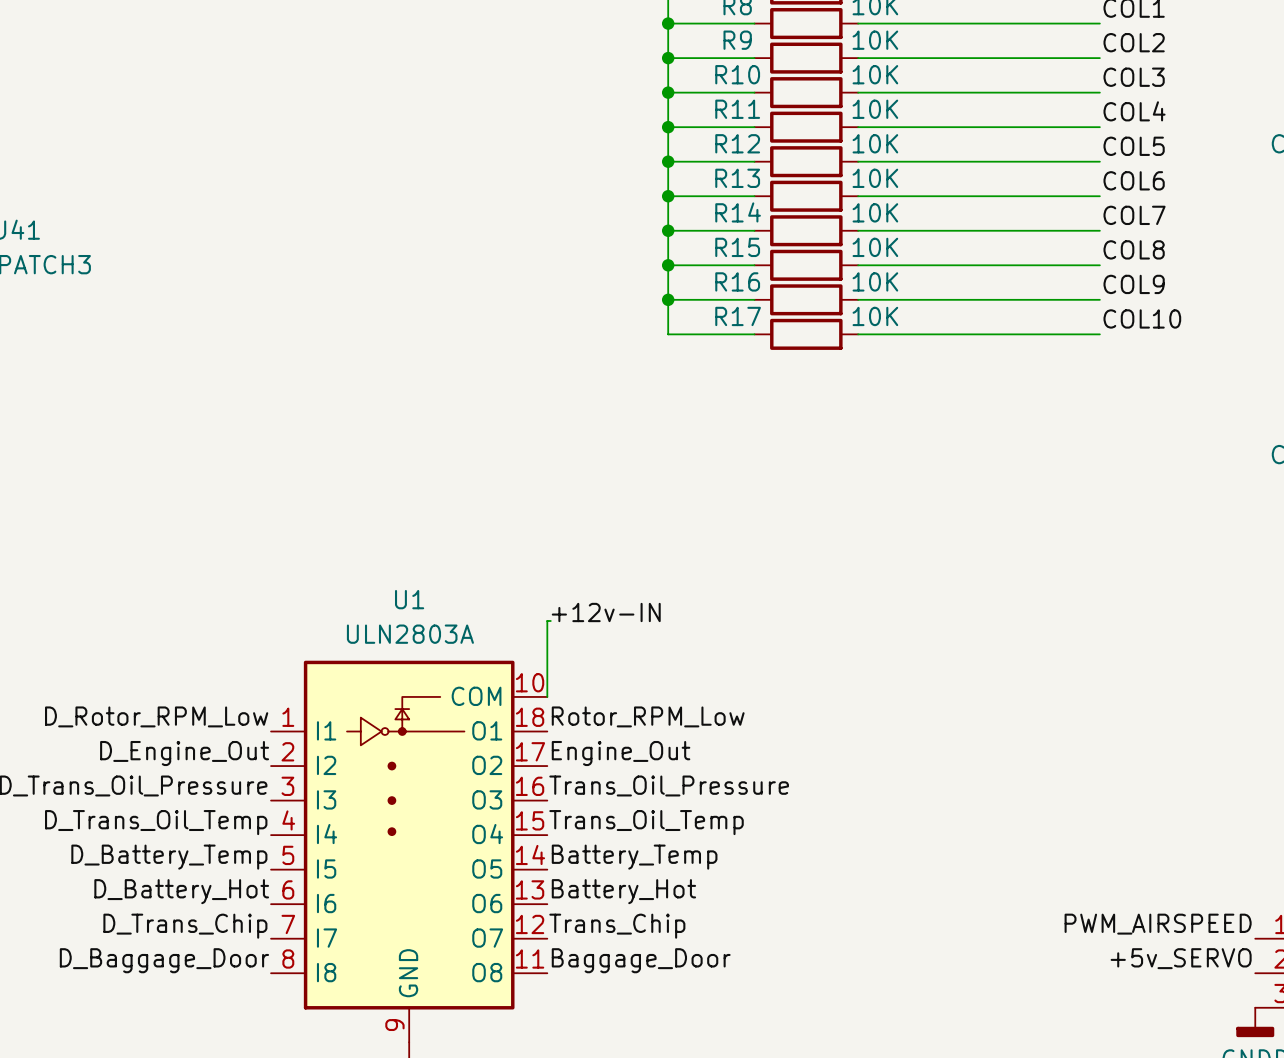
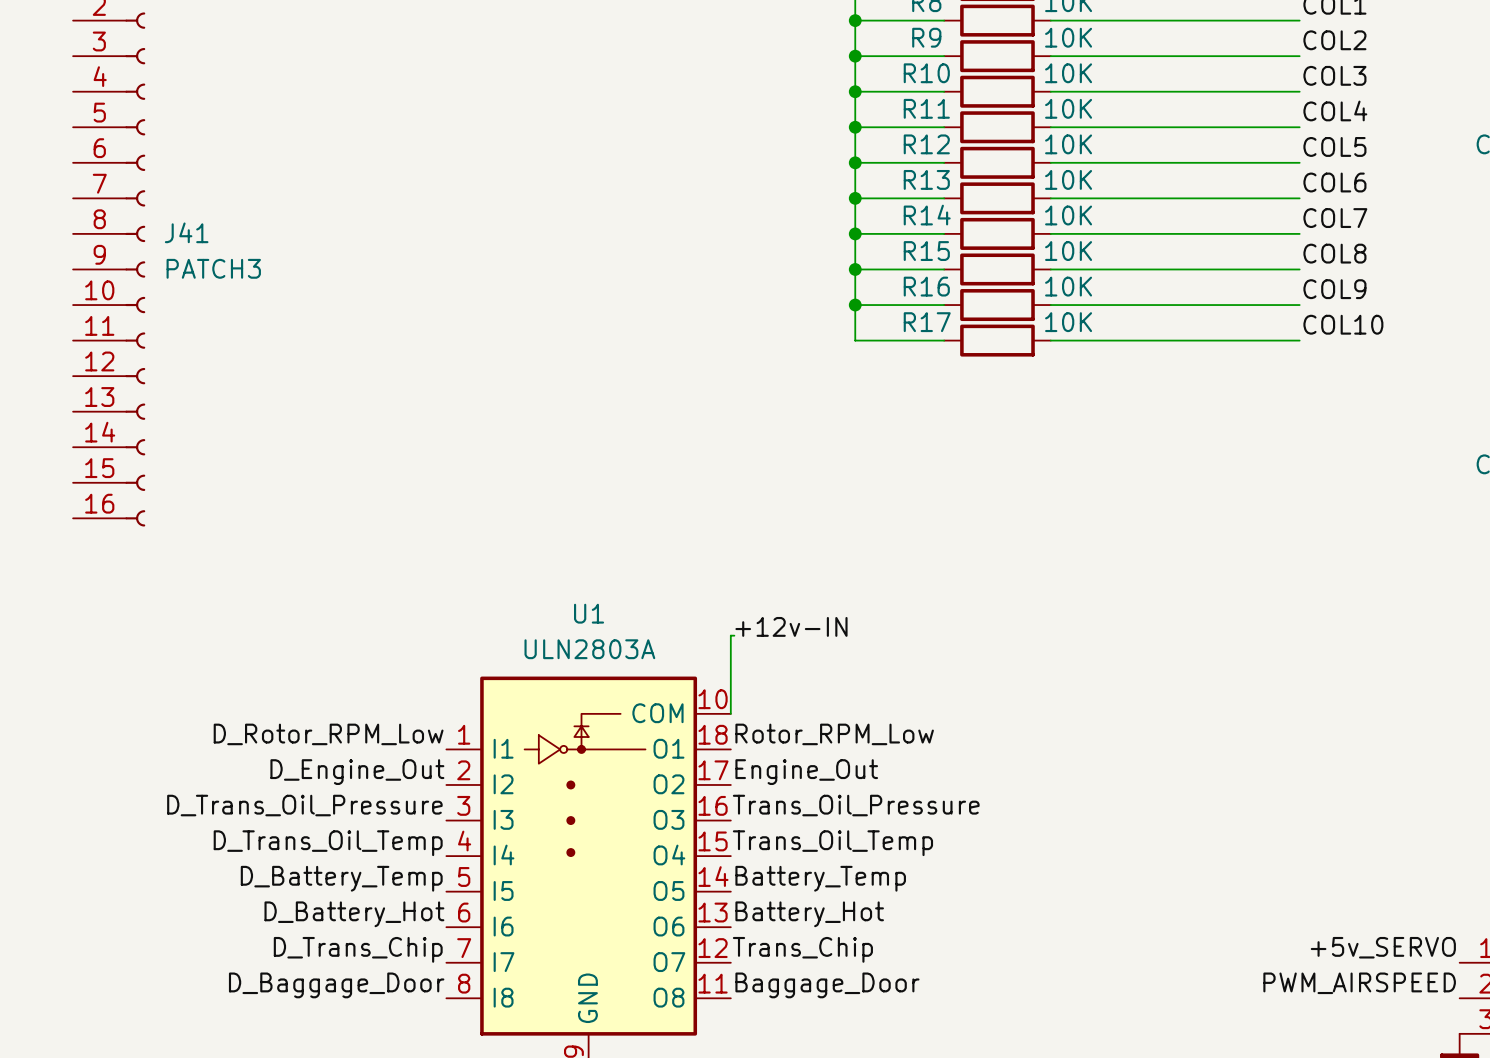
label: PWM_AIRSPEED (1158, 924) -> +5v_SERVO (1383, 947)
label: +5v_SERVO (1181, 958) -> PWM_AIRSPEED (1359, 983)

